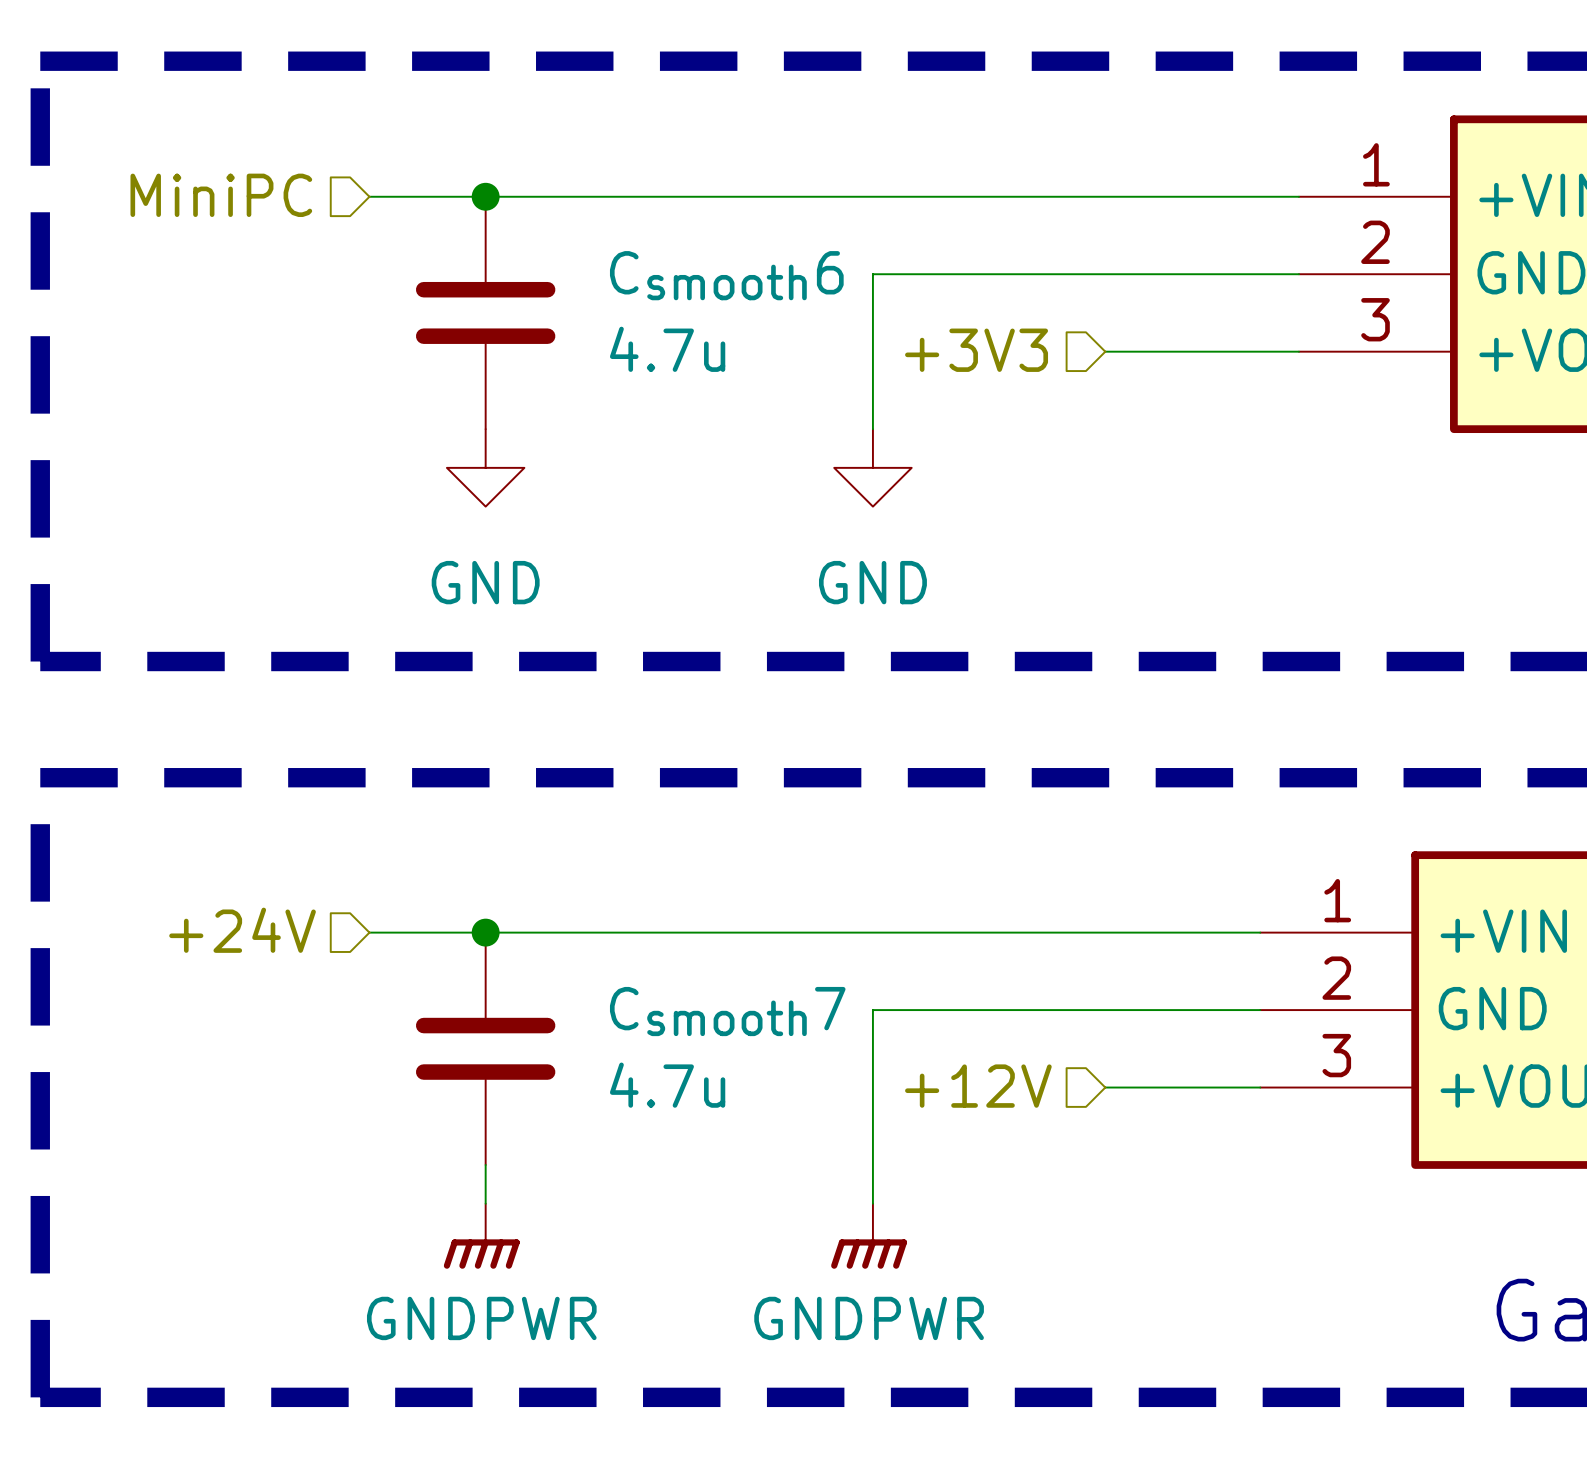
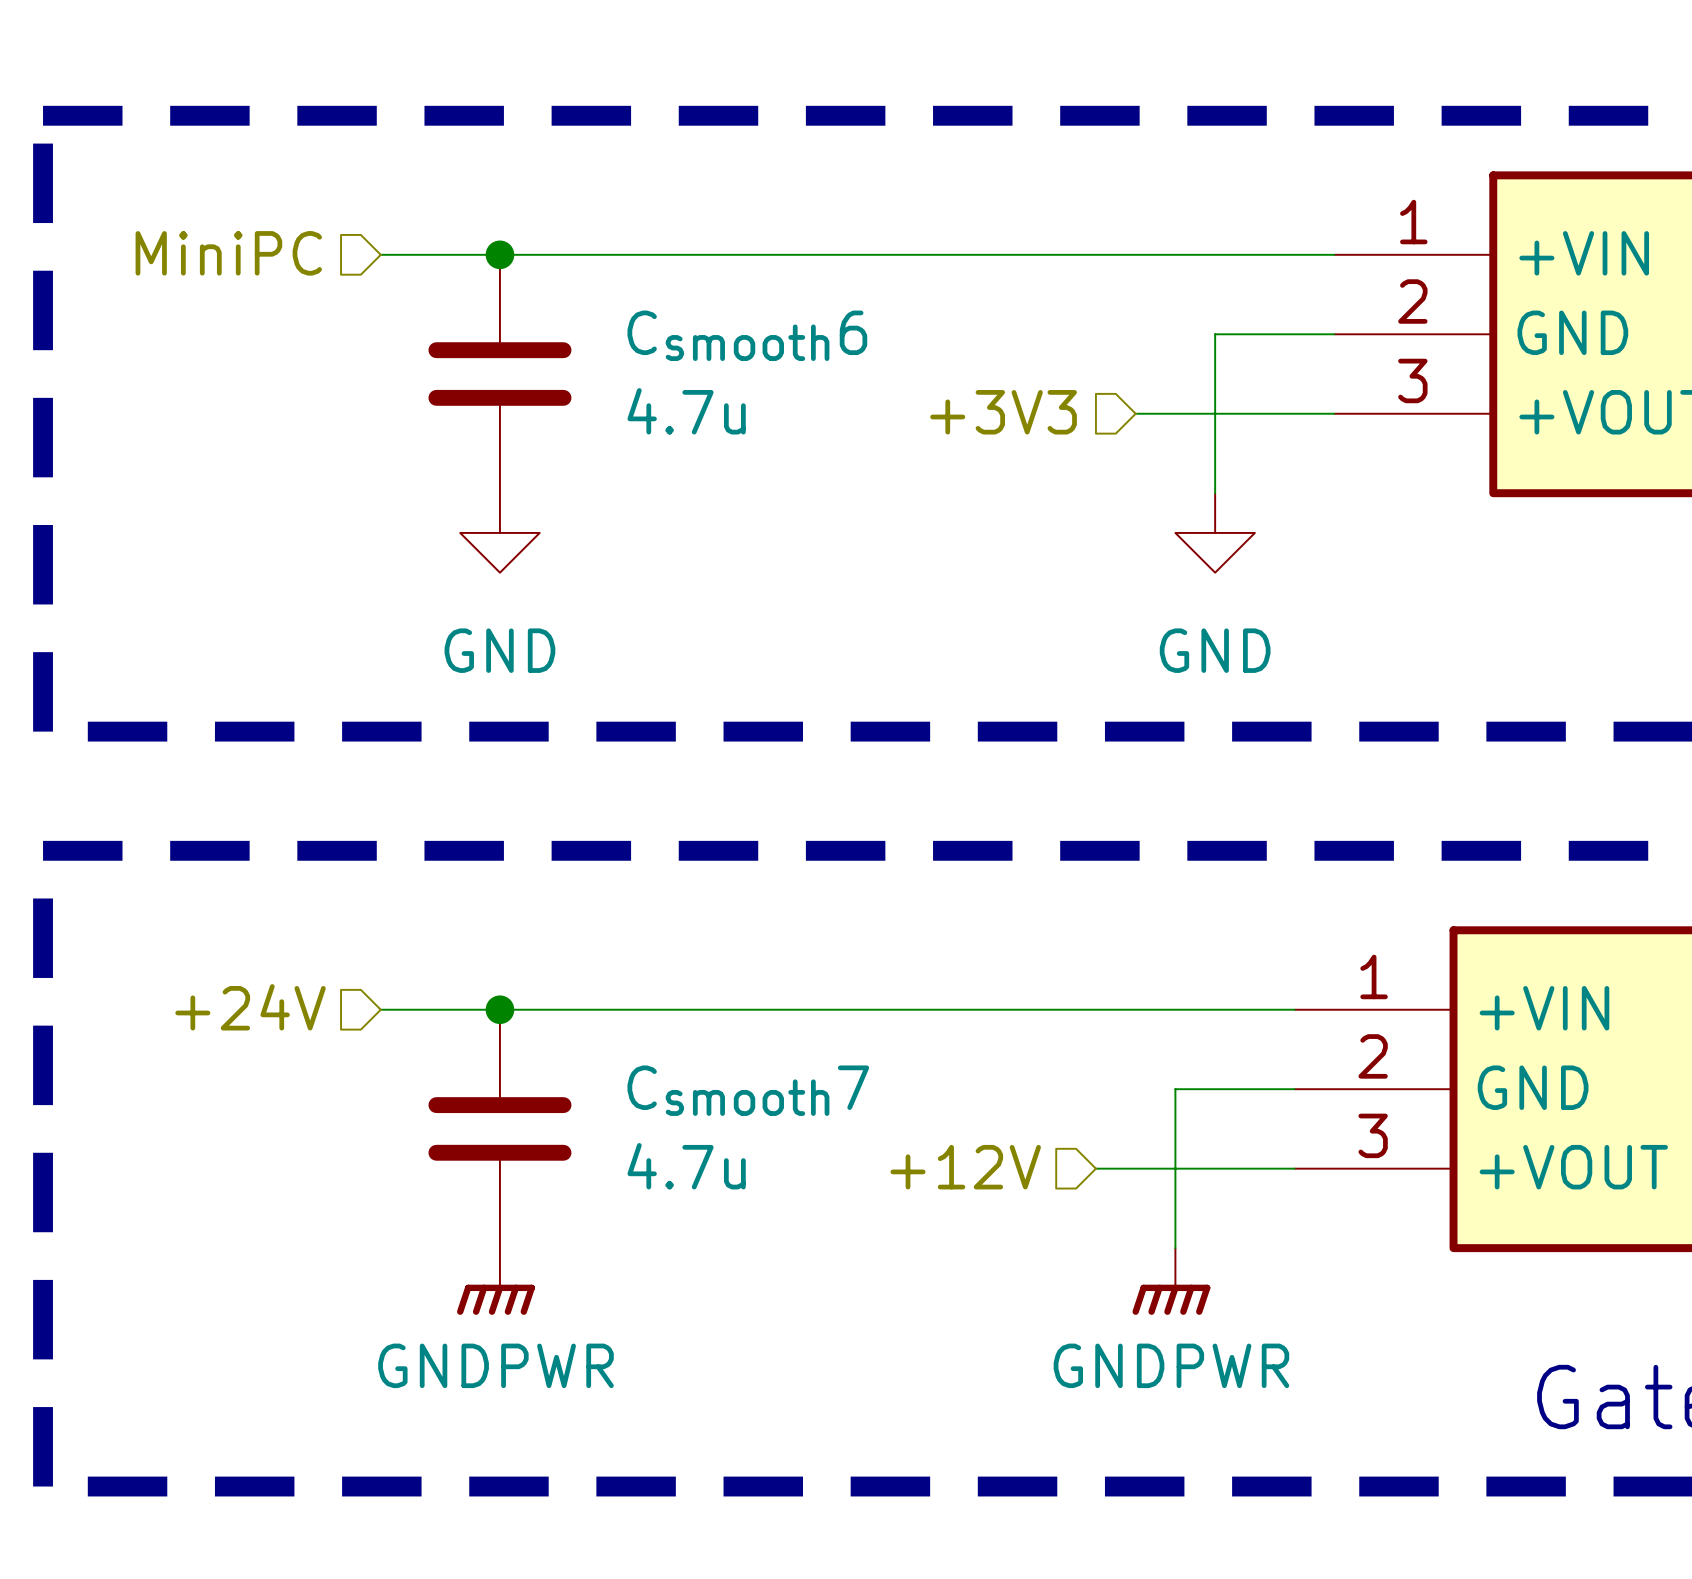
wire: (1182, 274) (872, 274) (872, 429) -> (1215, 334) (1215, 493)
power symbol position: GND (872, 467) -> GND (1215, 532)
wire: (1144, 1010) (872, 1010) (872, 1203) -> (1175, 1089) (1175, 1248)
hierarchical label position: +12V (978, 1086) -> +12V (965, 1167)
wire: none -> (1095, 1168) (1135, 1168)
power symbol: none -> GNDPWR (1171, 1281)
power symbol position: GNDPWR (481, 1236) -> GNDPWR (495, 1281)
power symbol: GNDPWR (869, 1236) -> none

